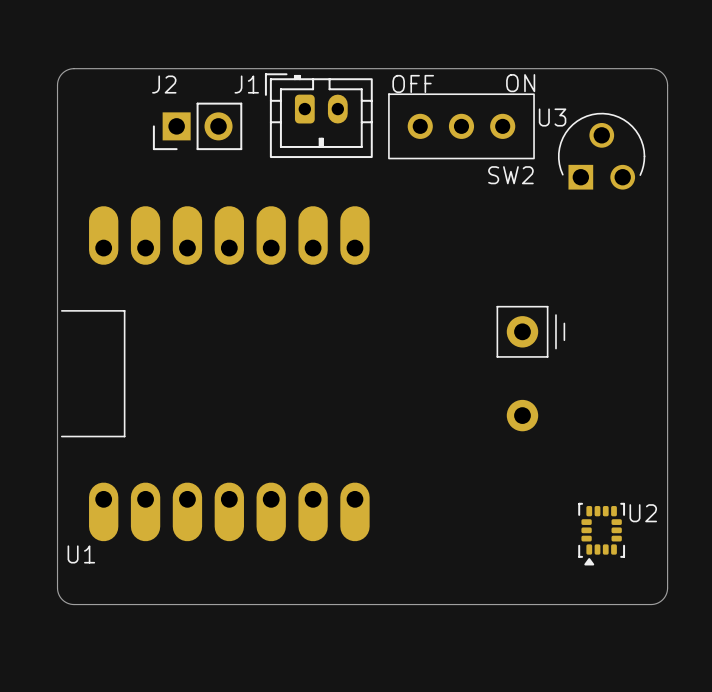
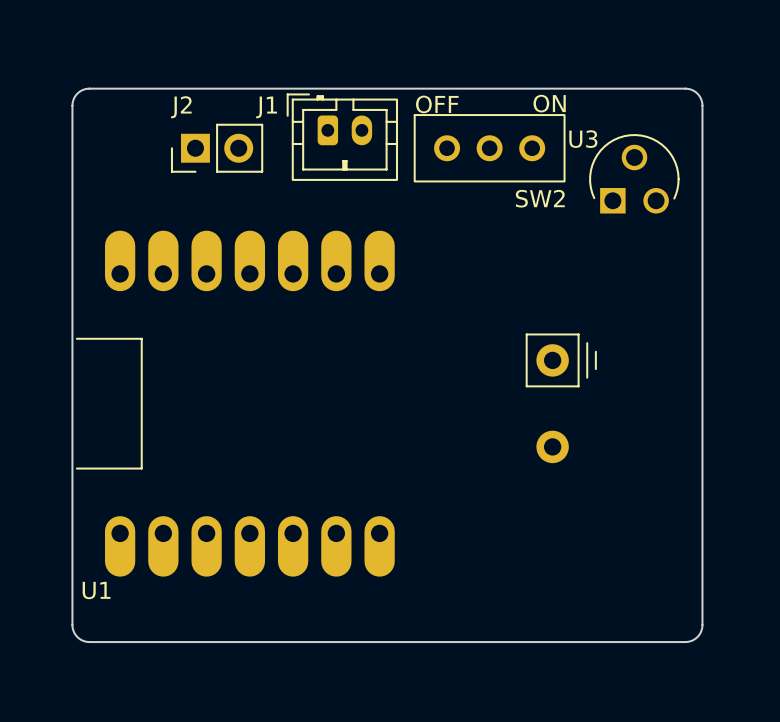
U2: (601, 534) -> none

